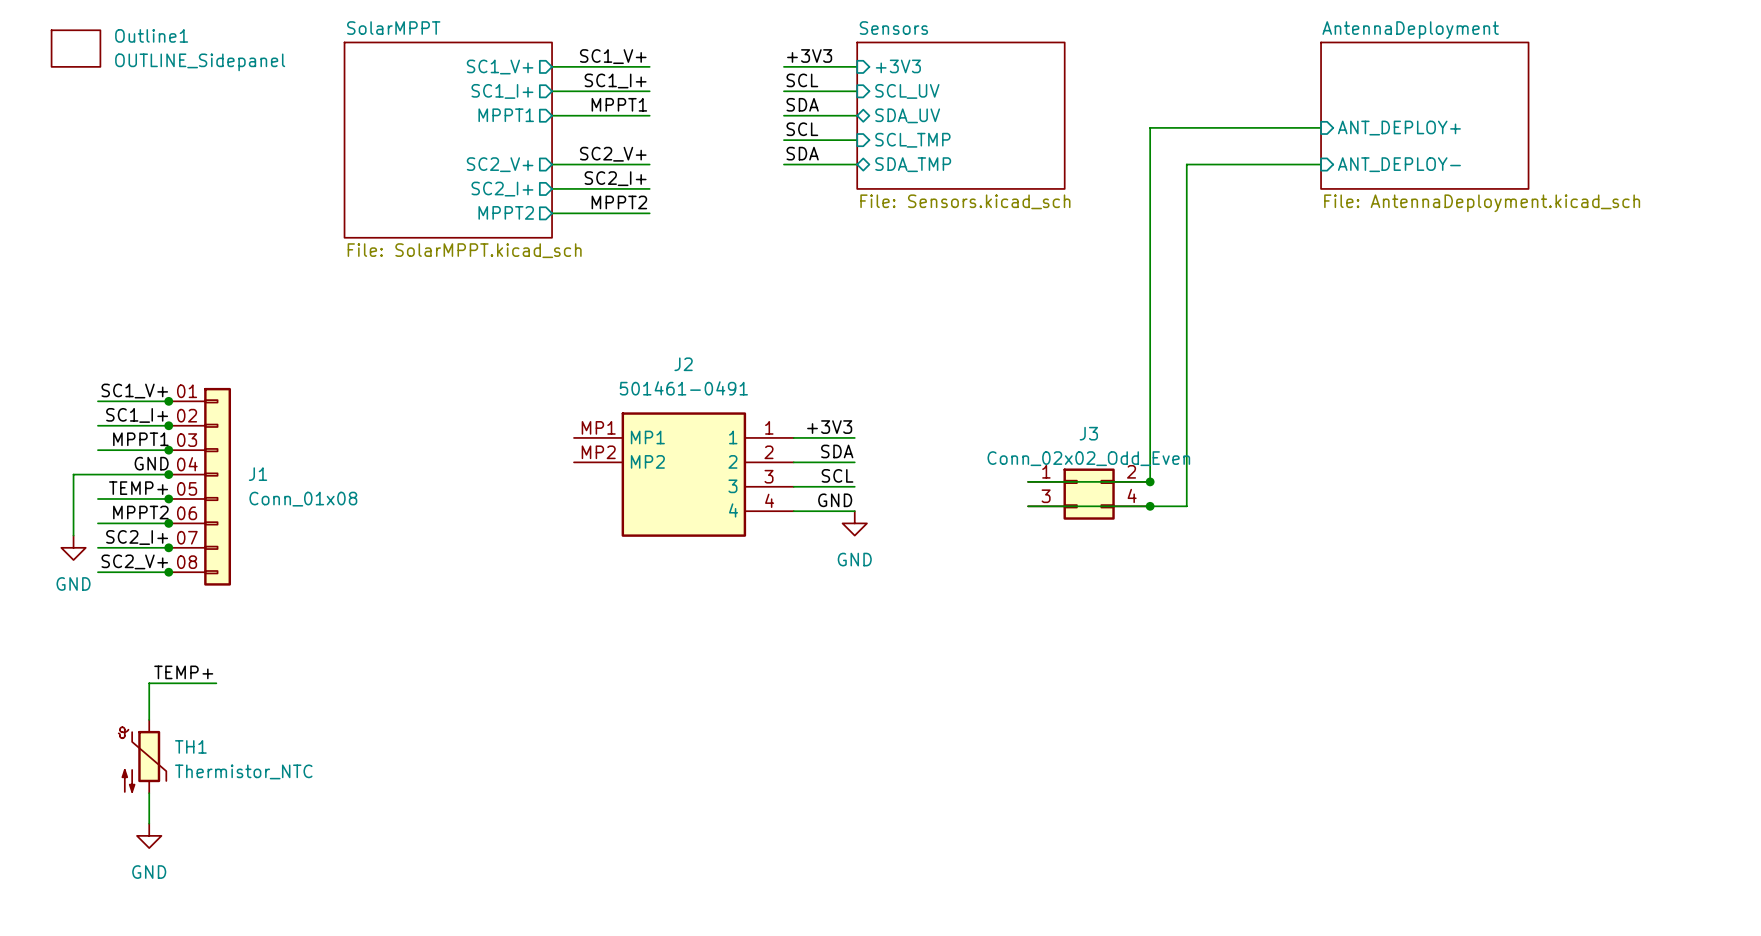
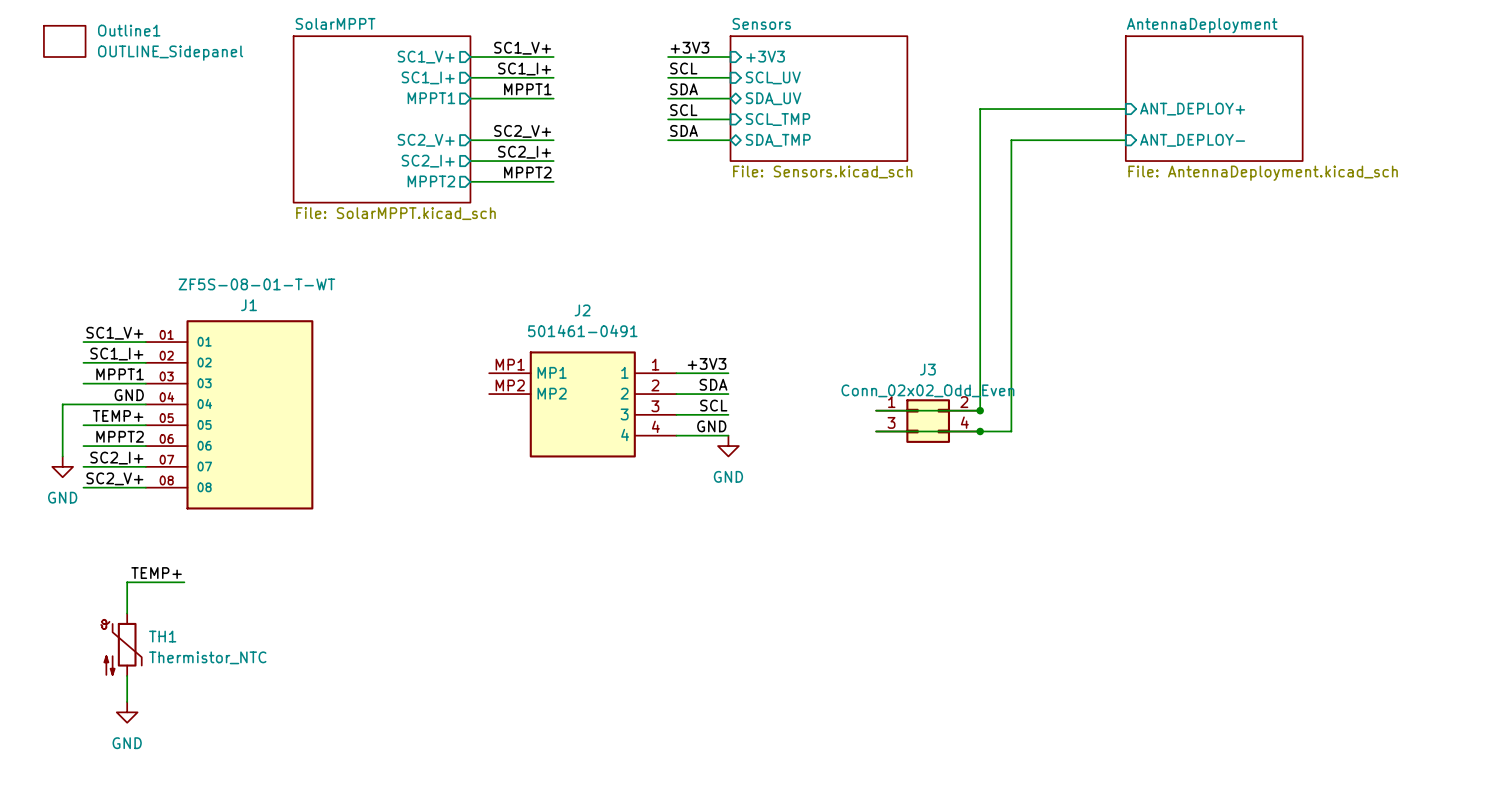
J1 symbol: [168, 387, 232, 586] -> [145, 320, 314, 510]
junction: (168, 401) -> none
junction: (168, 425) -> none
junction: (168, 450) -> none
junction: (168, 474) -> none
J1 name position: J1 (258, 474) -> J1 (249, 305)
junction: (168, 498) -> none
J1 value: Conn_01x08 (303, 499) -> ZF5S-08-01-T-WT (256, 284)
junction: (168, 523) -> none
junction: (168, 547) -> none
junction: (168, 572) -> none
TH1 symbol: [118, 719, 167, 794] -> [101, 613, 142, 676]

